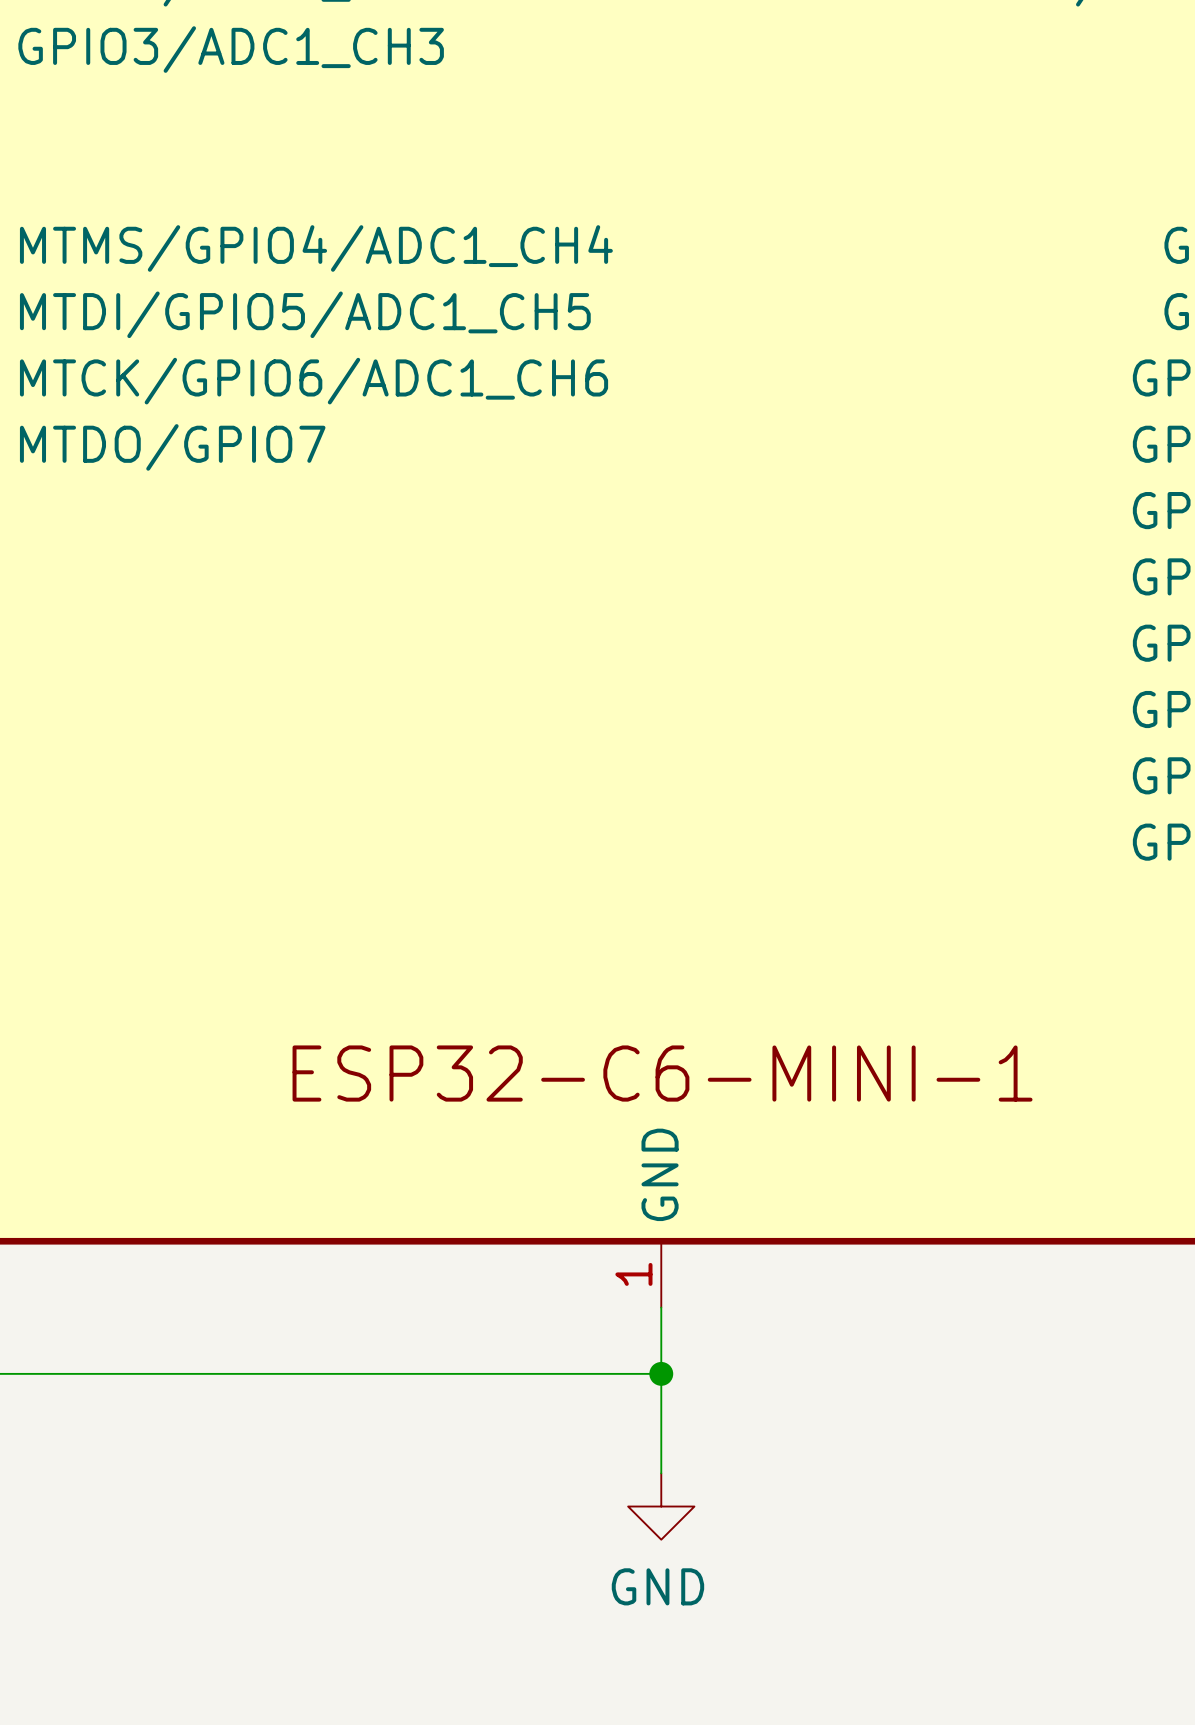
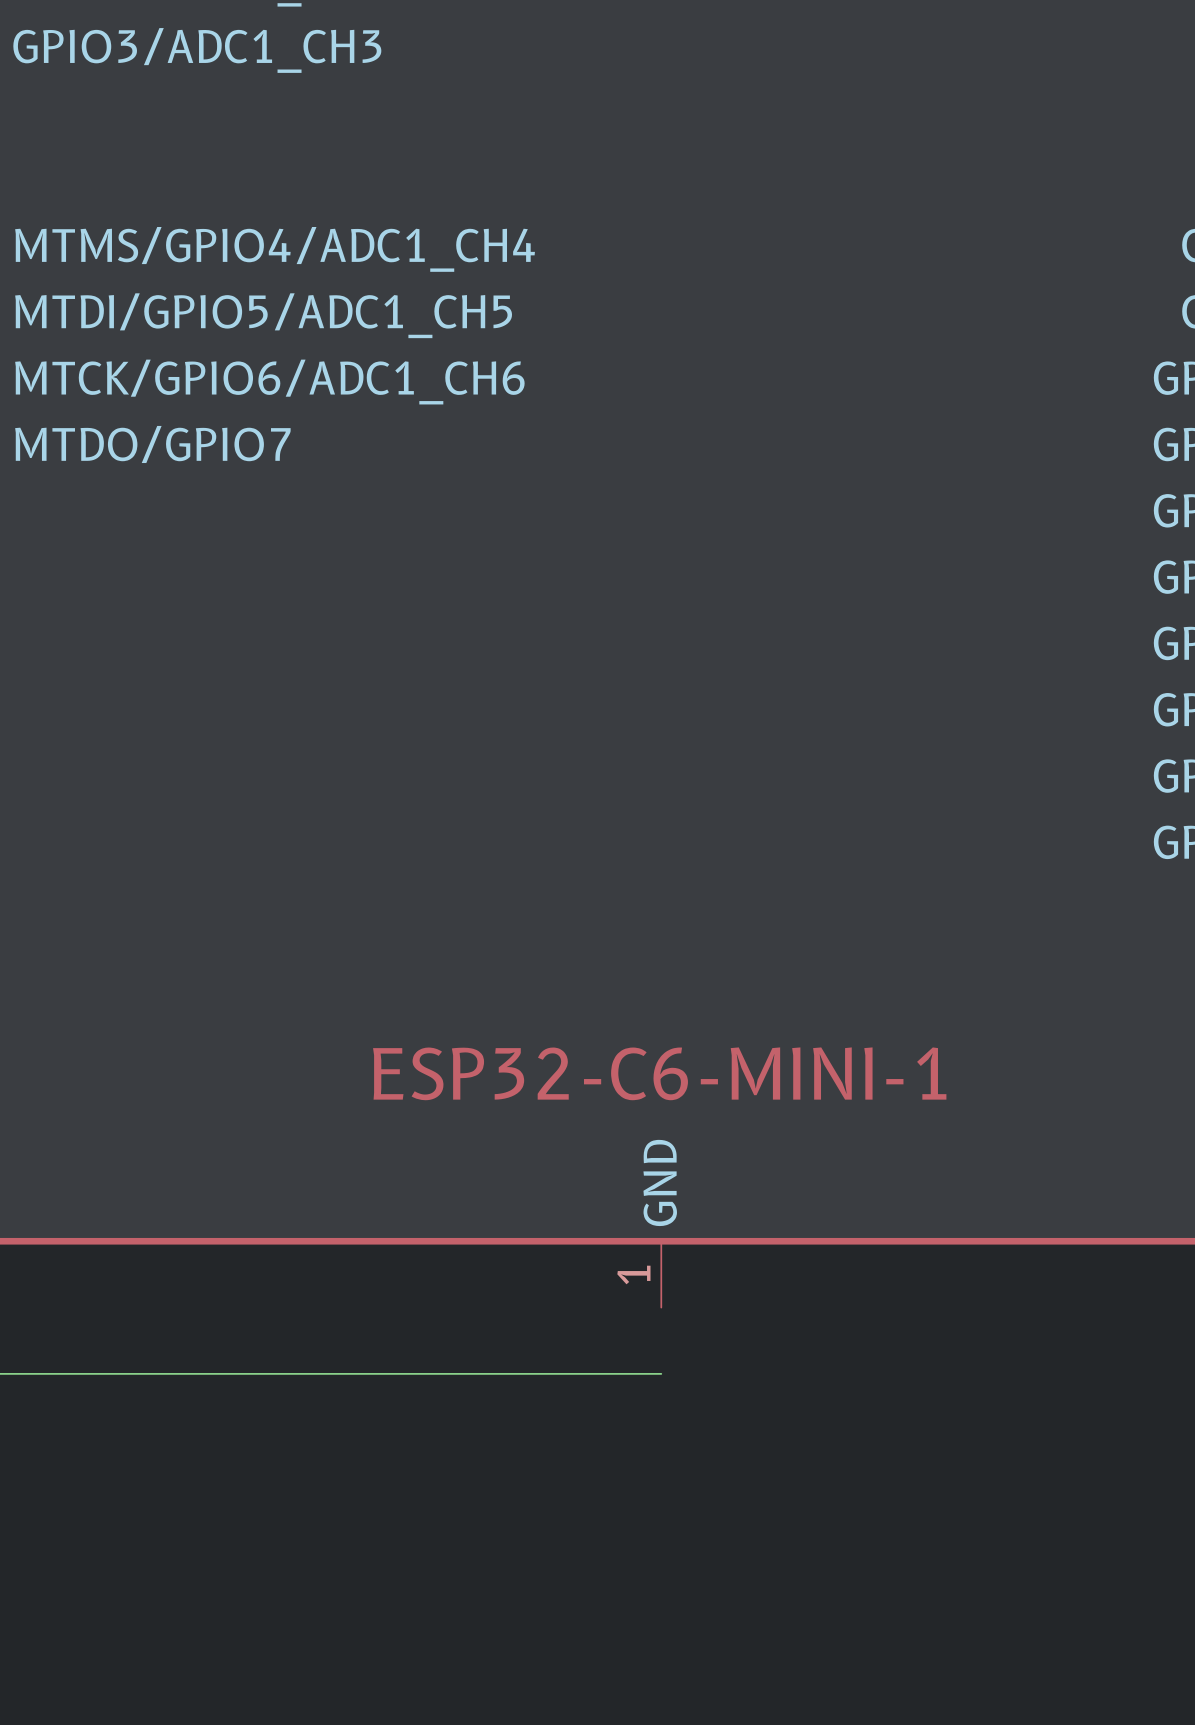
wire: (661, 1307) (661, 1473) -> none
junction: (661, 1373) -> none
power symbol: GND (661, 1506) -> none

